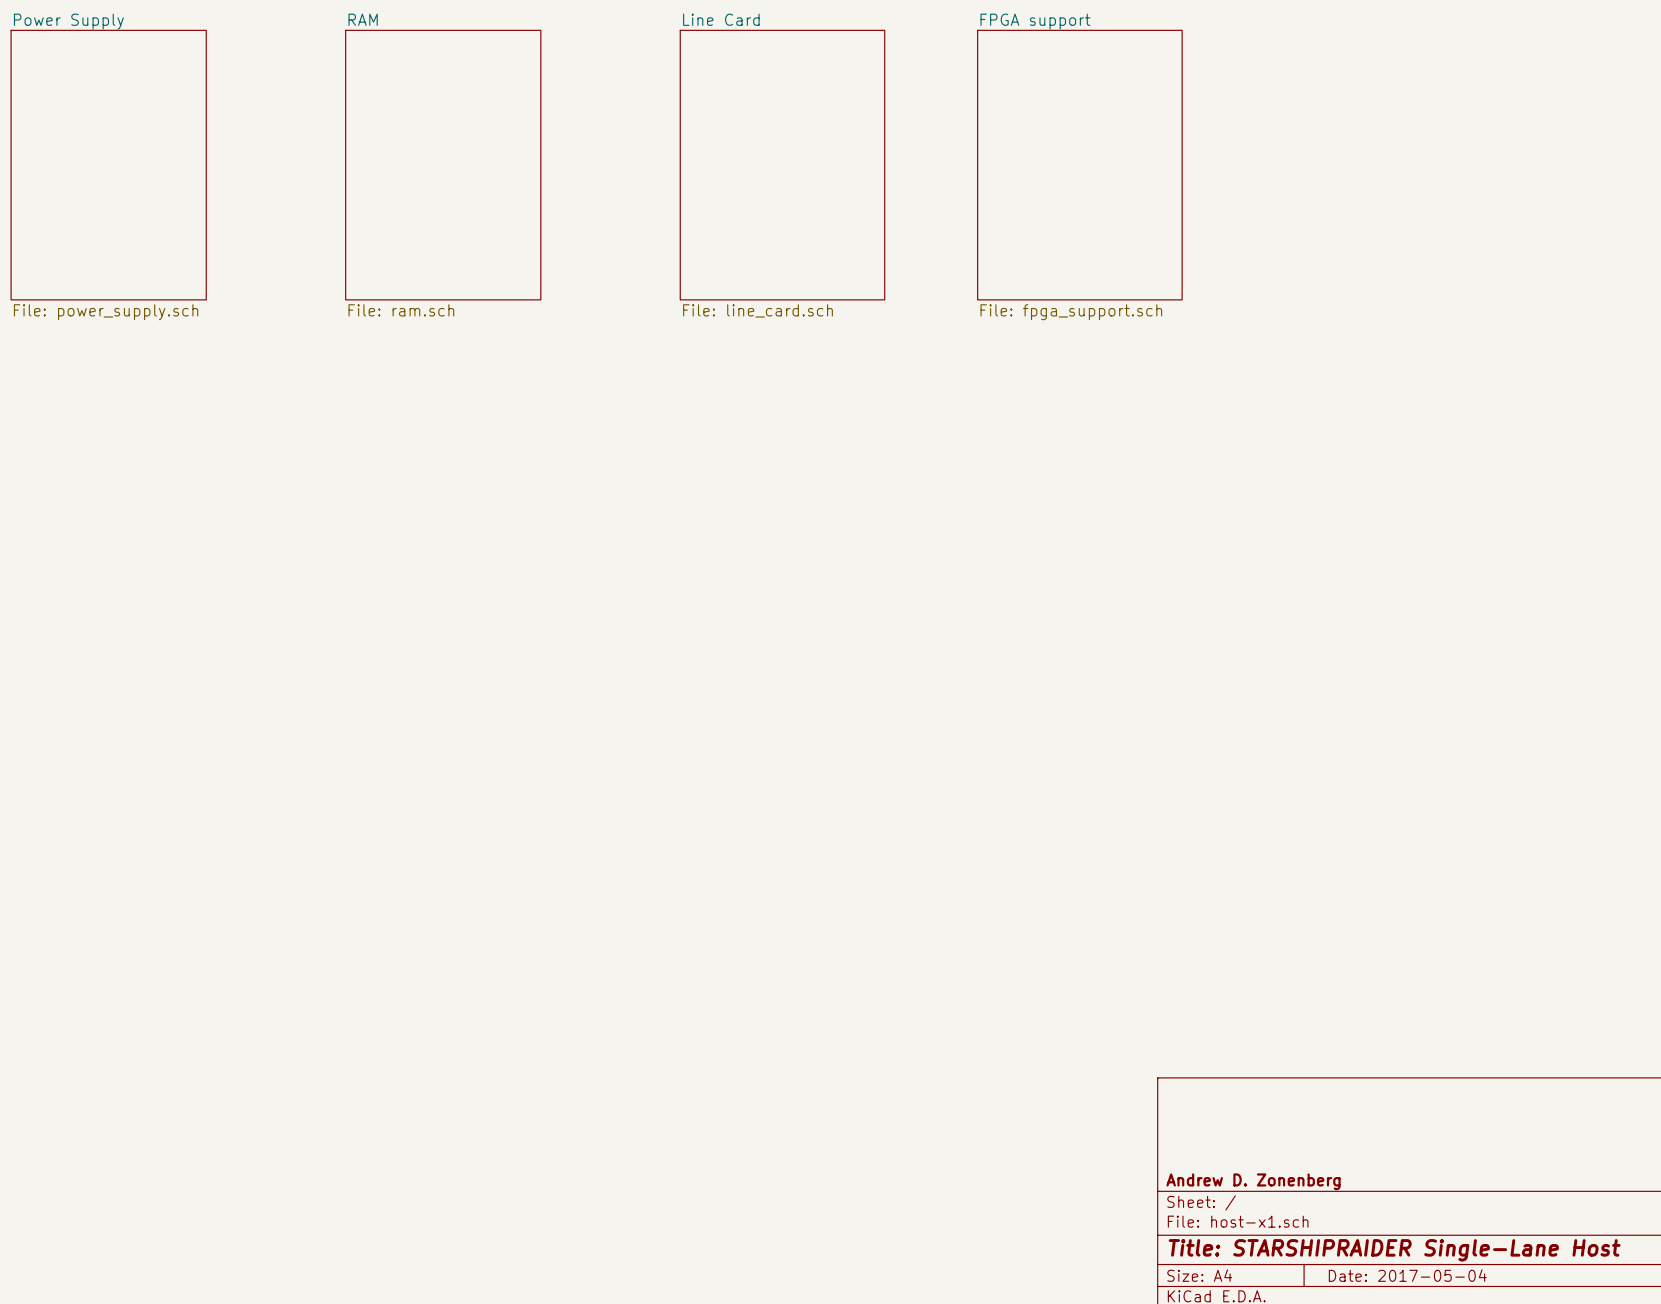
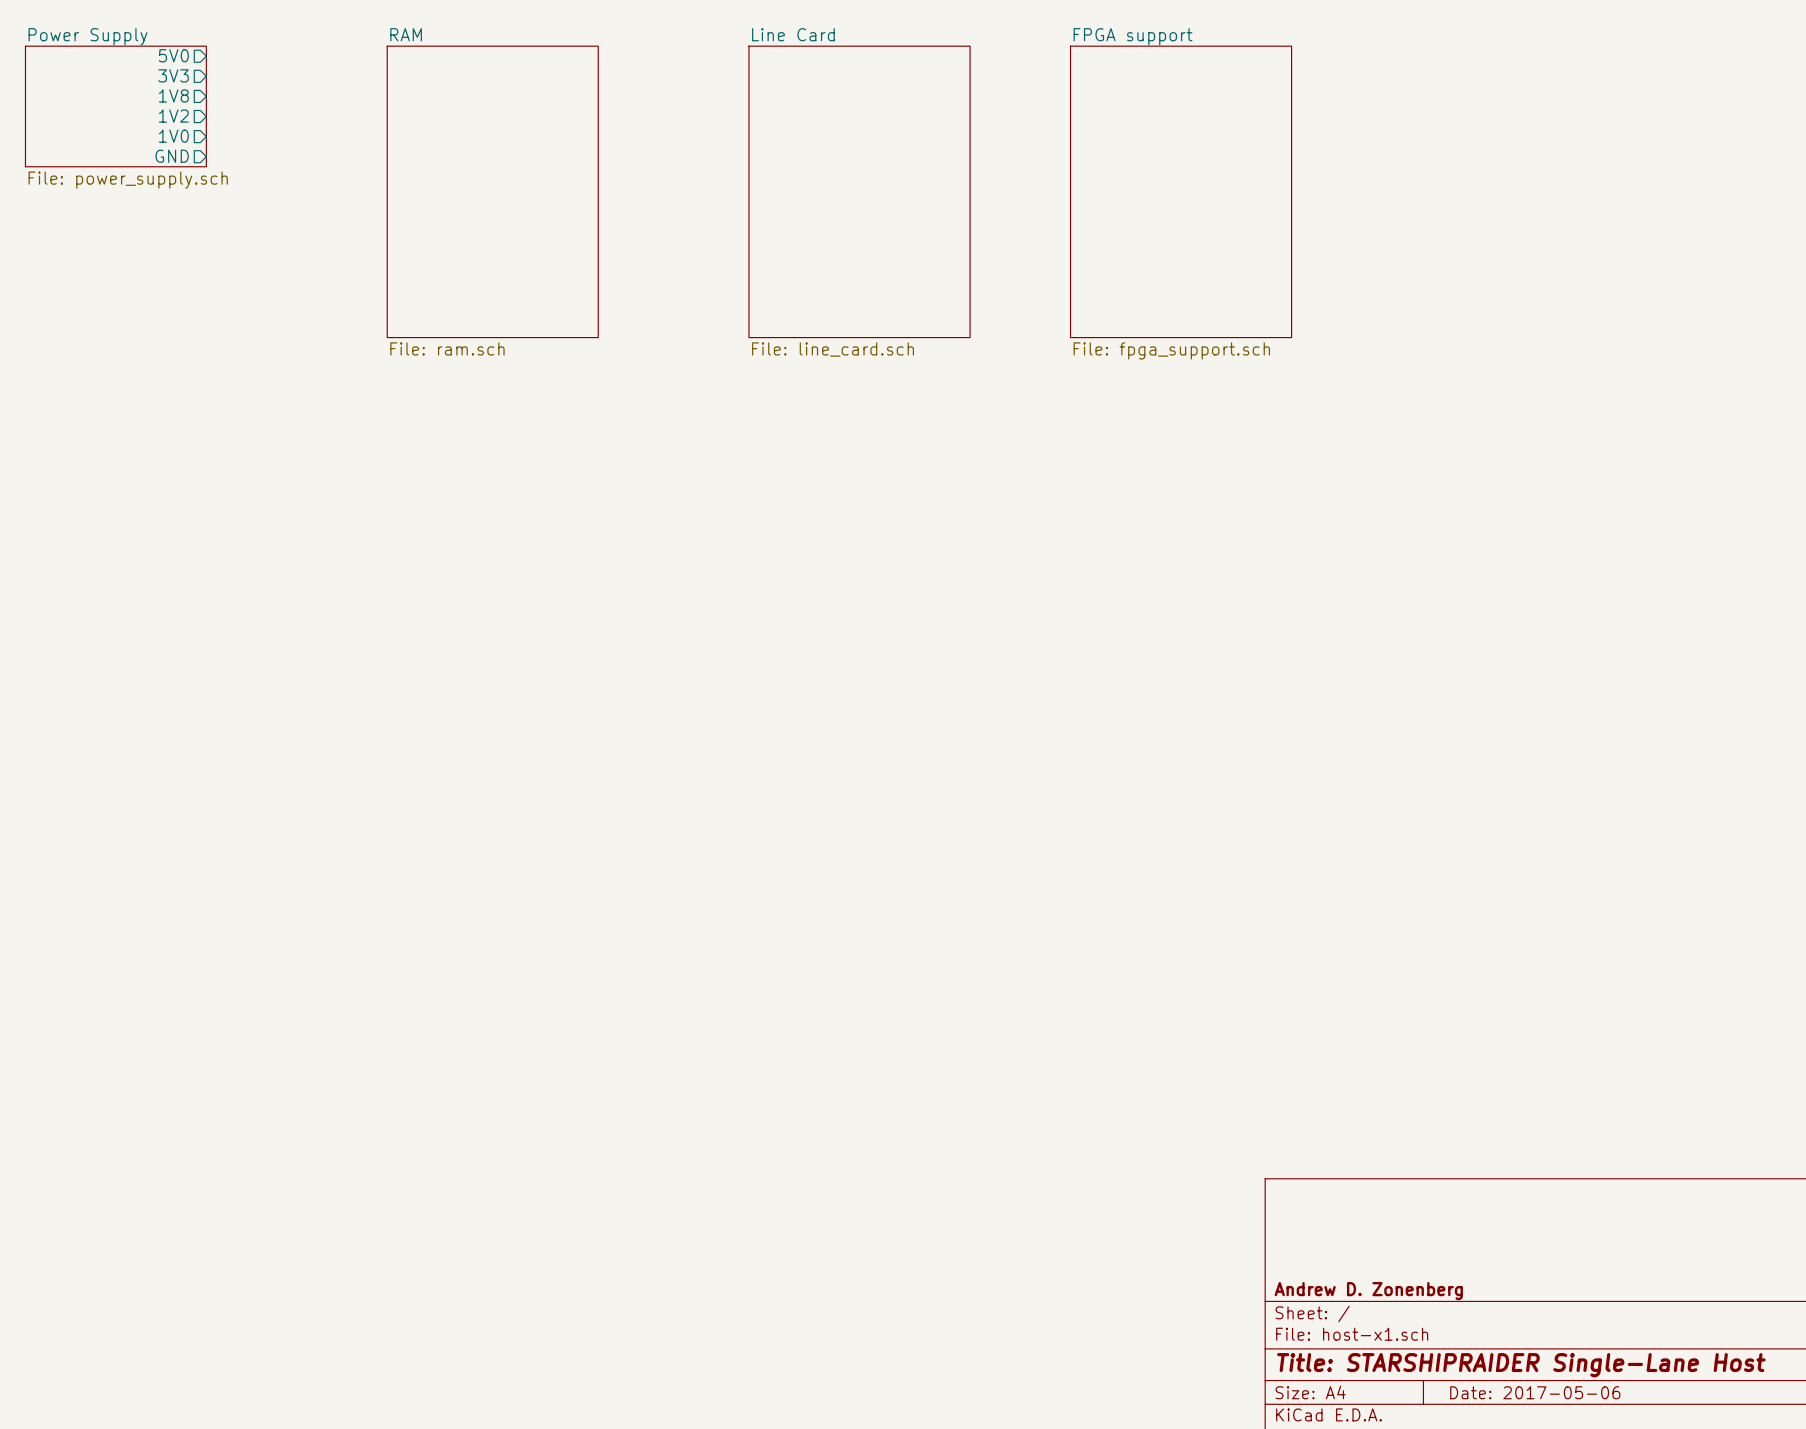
sheet pin: none -> 5V0 (173, 55)
sheet pin: none -> 3V3 (173, 75)
sheet pin: none -> 1V8 (173, 95)
sheet Power Supply: none -> File: power_supply.sch (115, 106)
sheet pin: none -> 1V2 (173, 116)
sheet pin: none -> 1V0 (173, 136)
sheet pin: none -> GND (172, 156)
sheet Power Supply: File: power_supply.sch (108, 165) -> none
title block: Date: 2017-05-04 (1407, 1275) -> Date: 2017-05-06 (1535, 1392)

